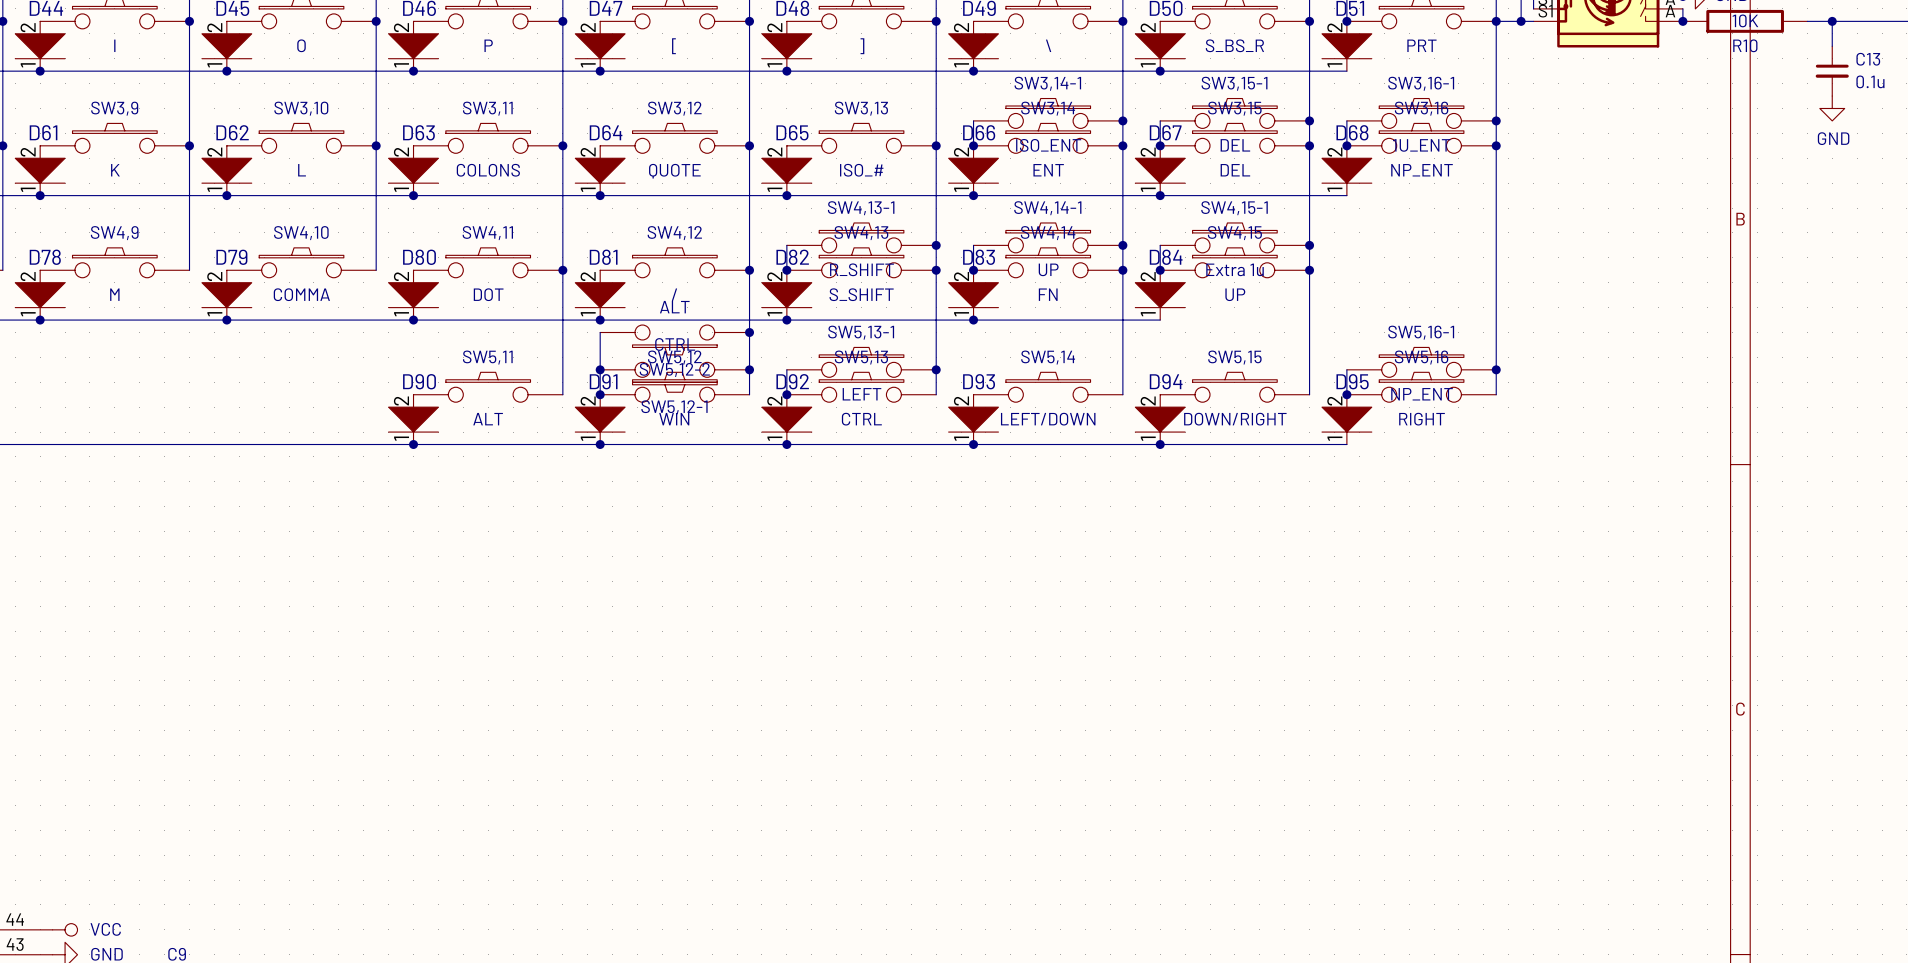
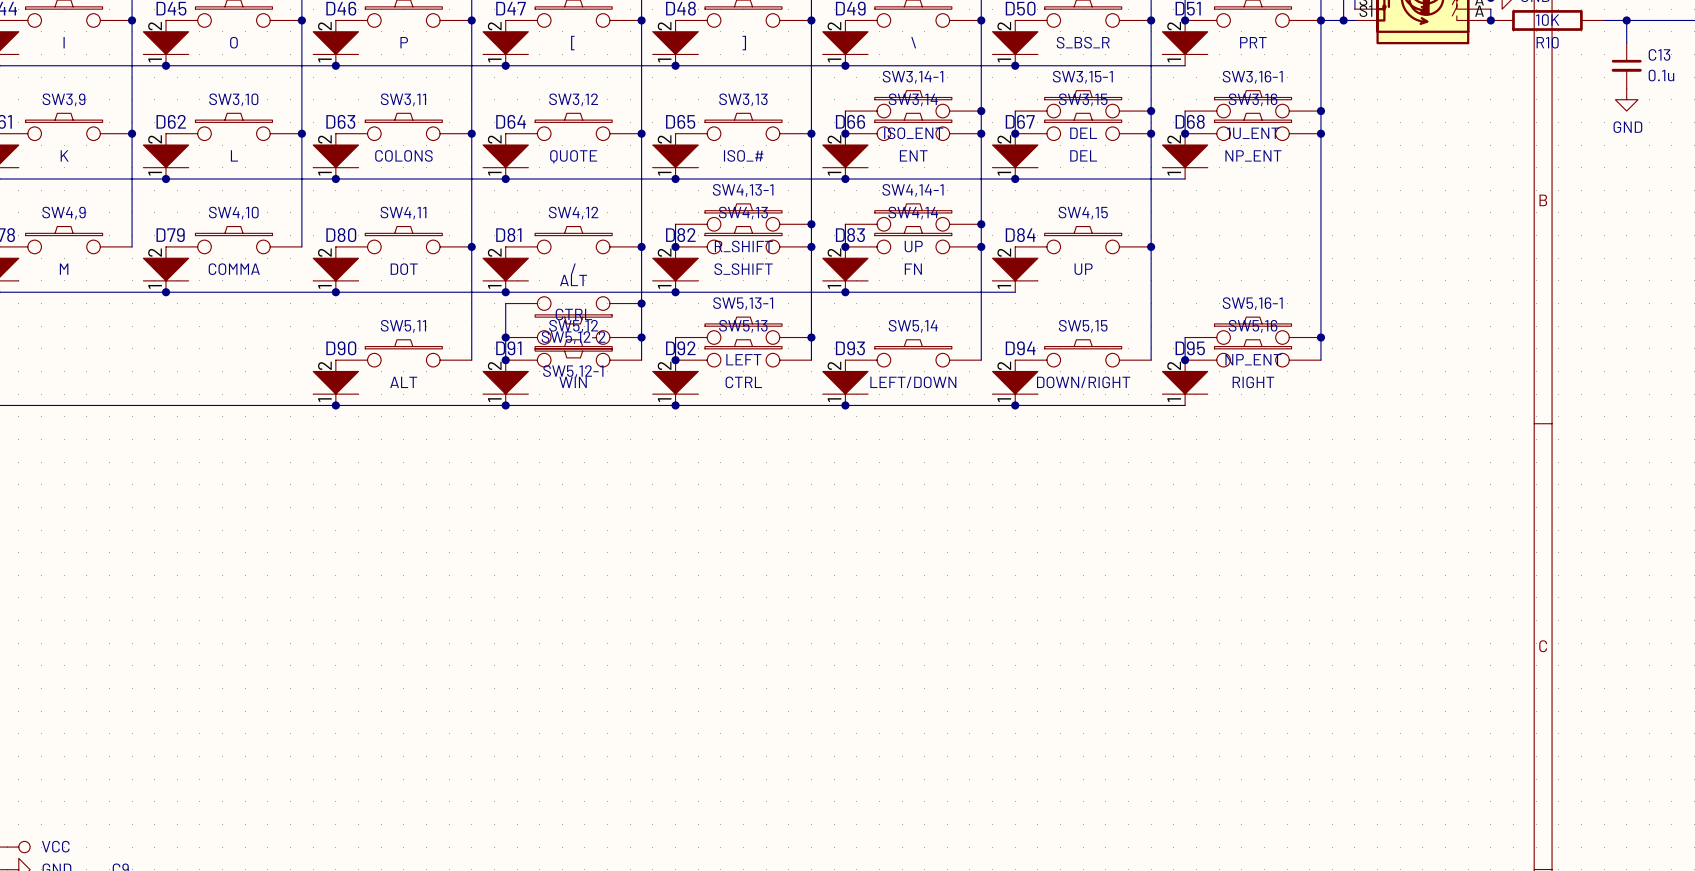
SW4,15-1: Extra 1u (1234, 237) -> none
wire: (1160, 245) (1160, 270) -> none
junction: (1309, 245) -> none
junction: (1160, 270) -> none

